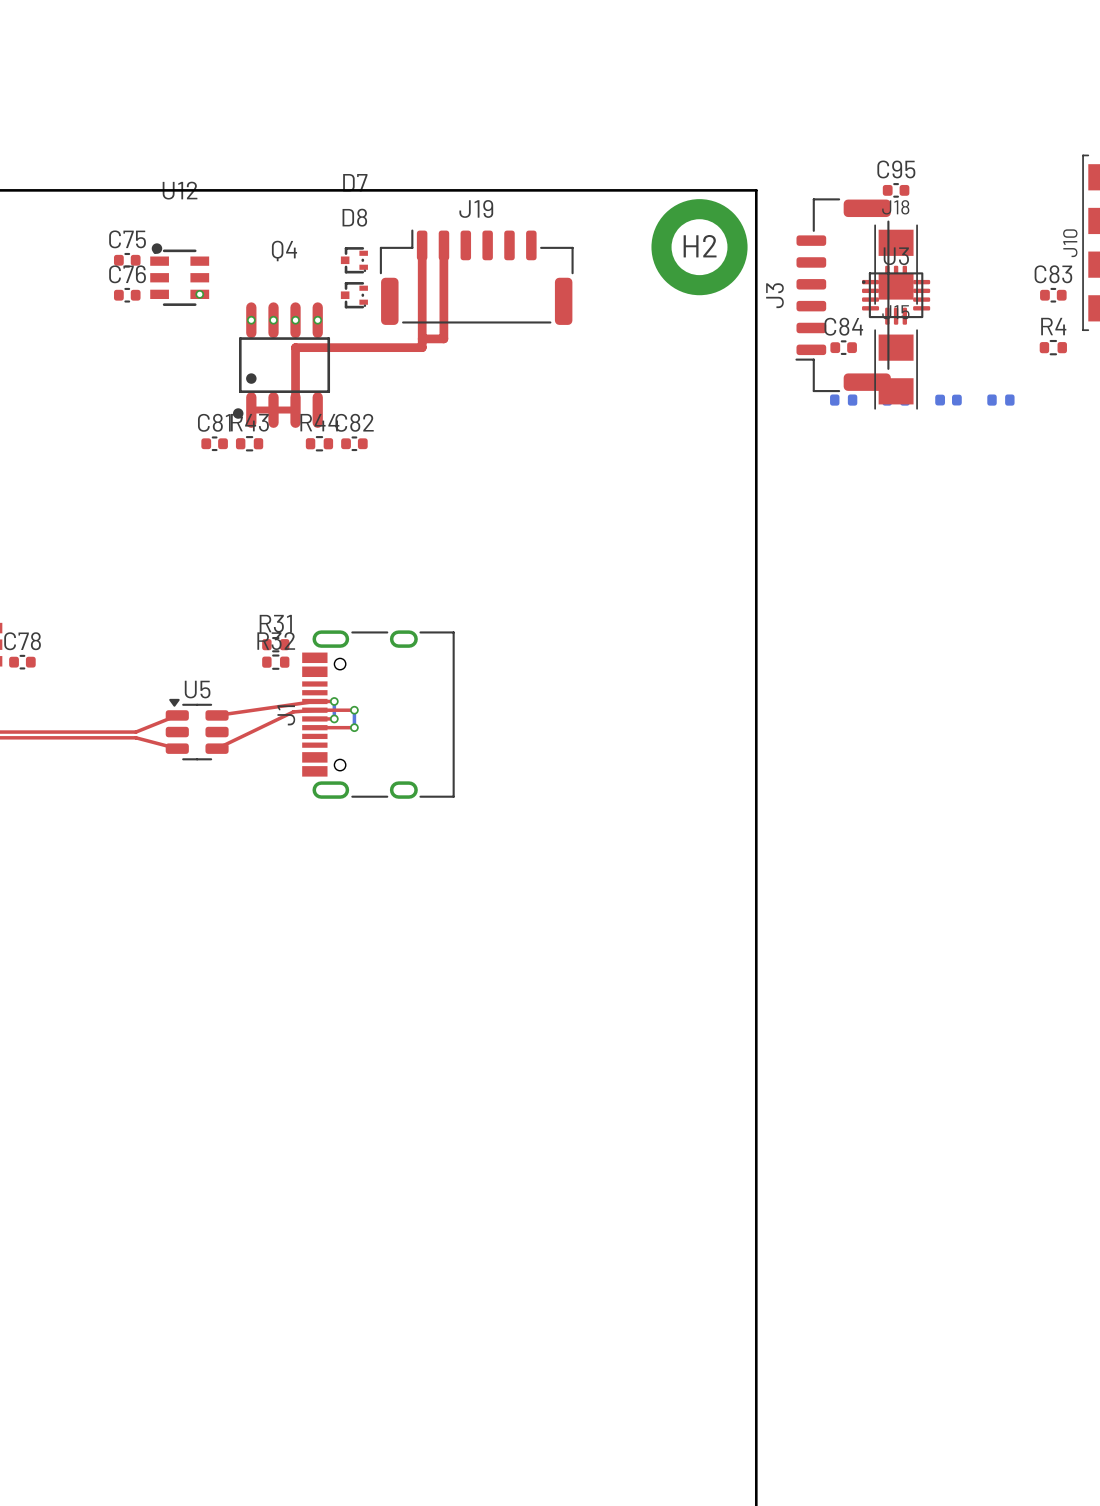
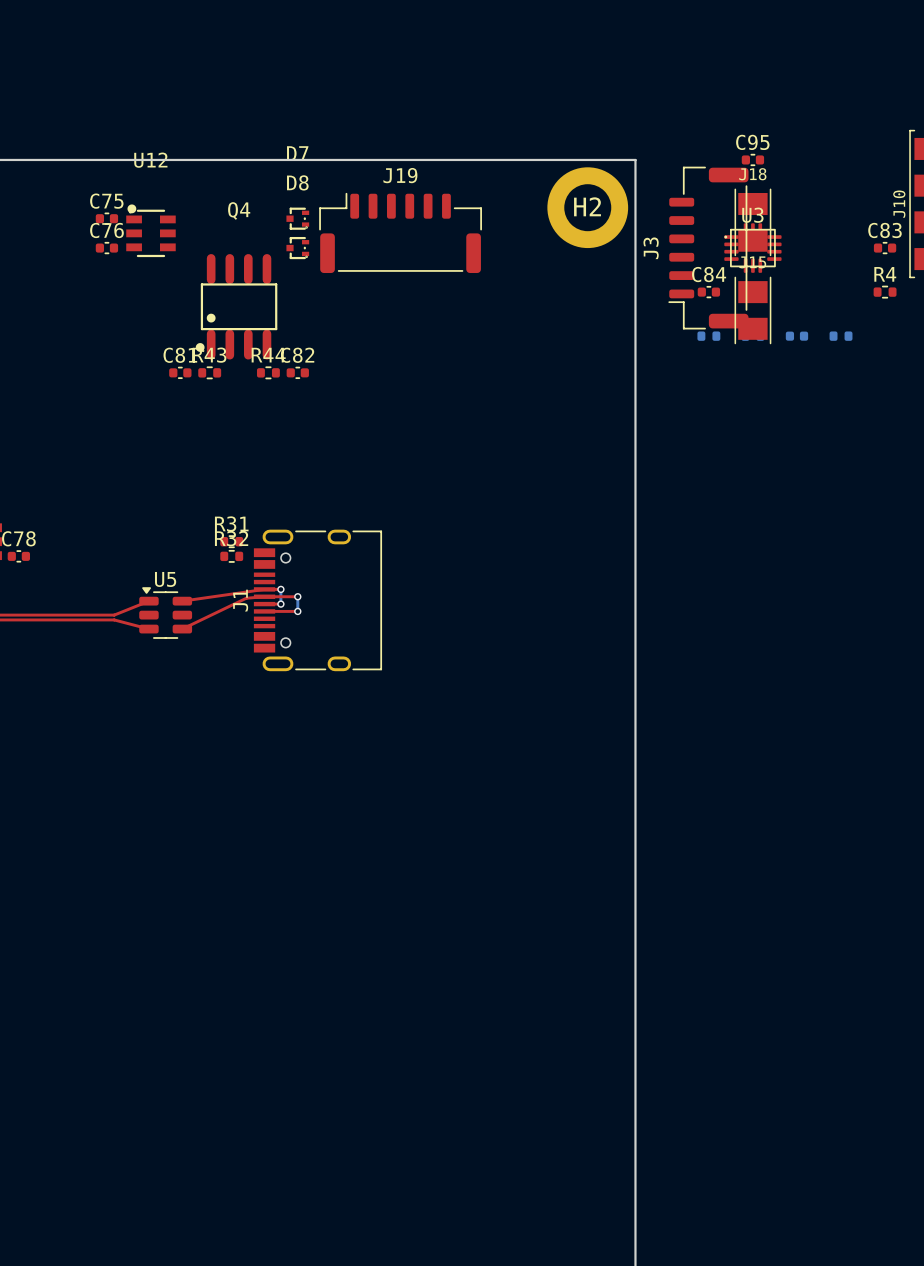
top track: (422, 245) (422, 347) (295, 347) (295, 410) (251, 410) -> none
top track: (443, 245) (443, 338) (422, 338) -> none
via: (199, 294) -> none
via: (251, 320) -> none
via: (273, 320) -> none
via: (295, 320) -> none
via: (317, 320) -> none

